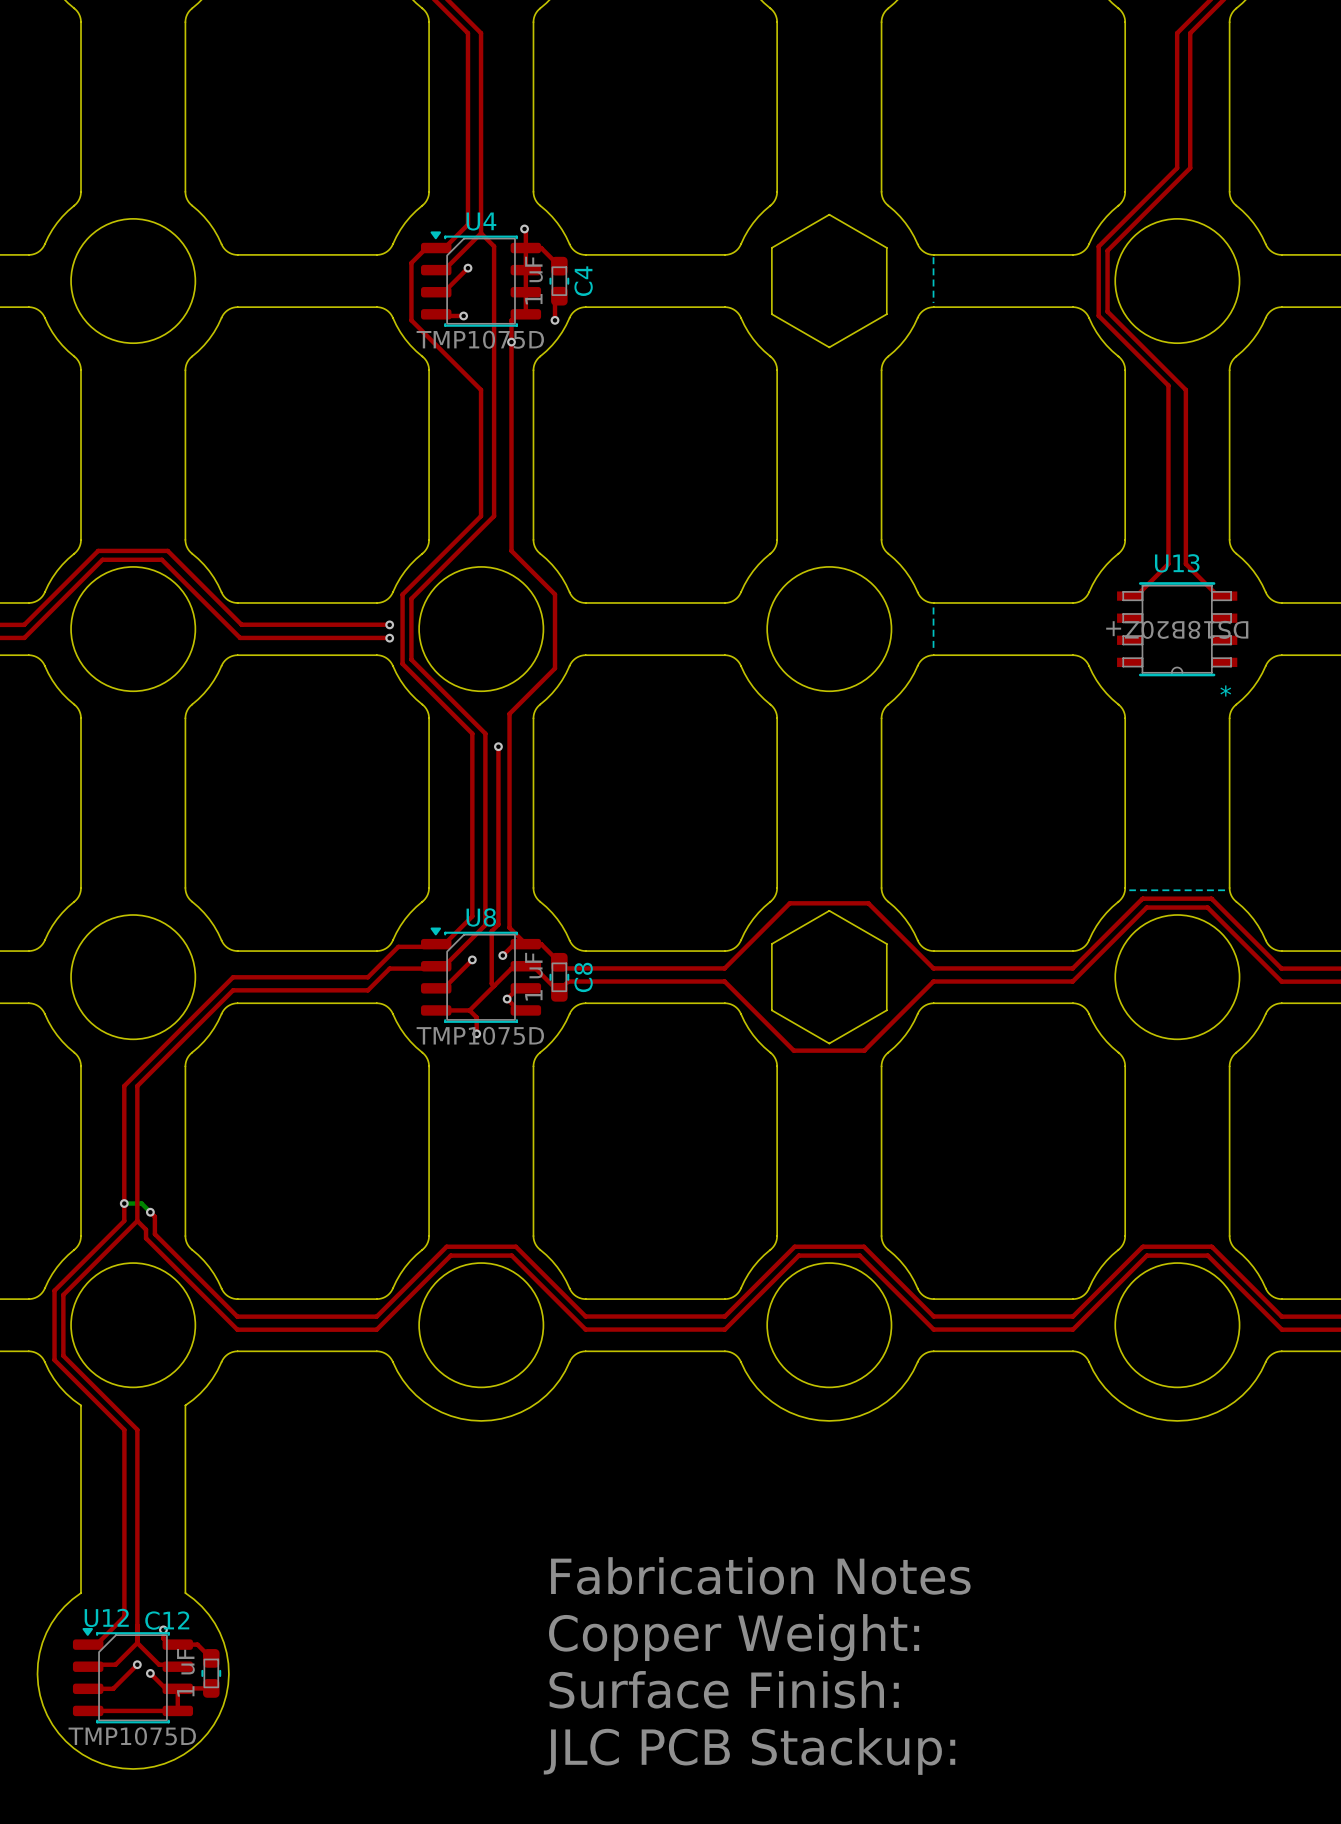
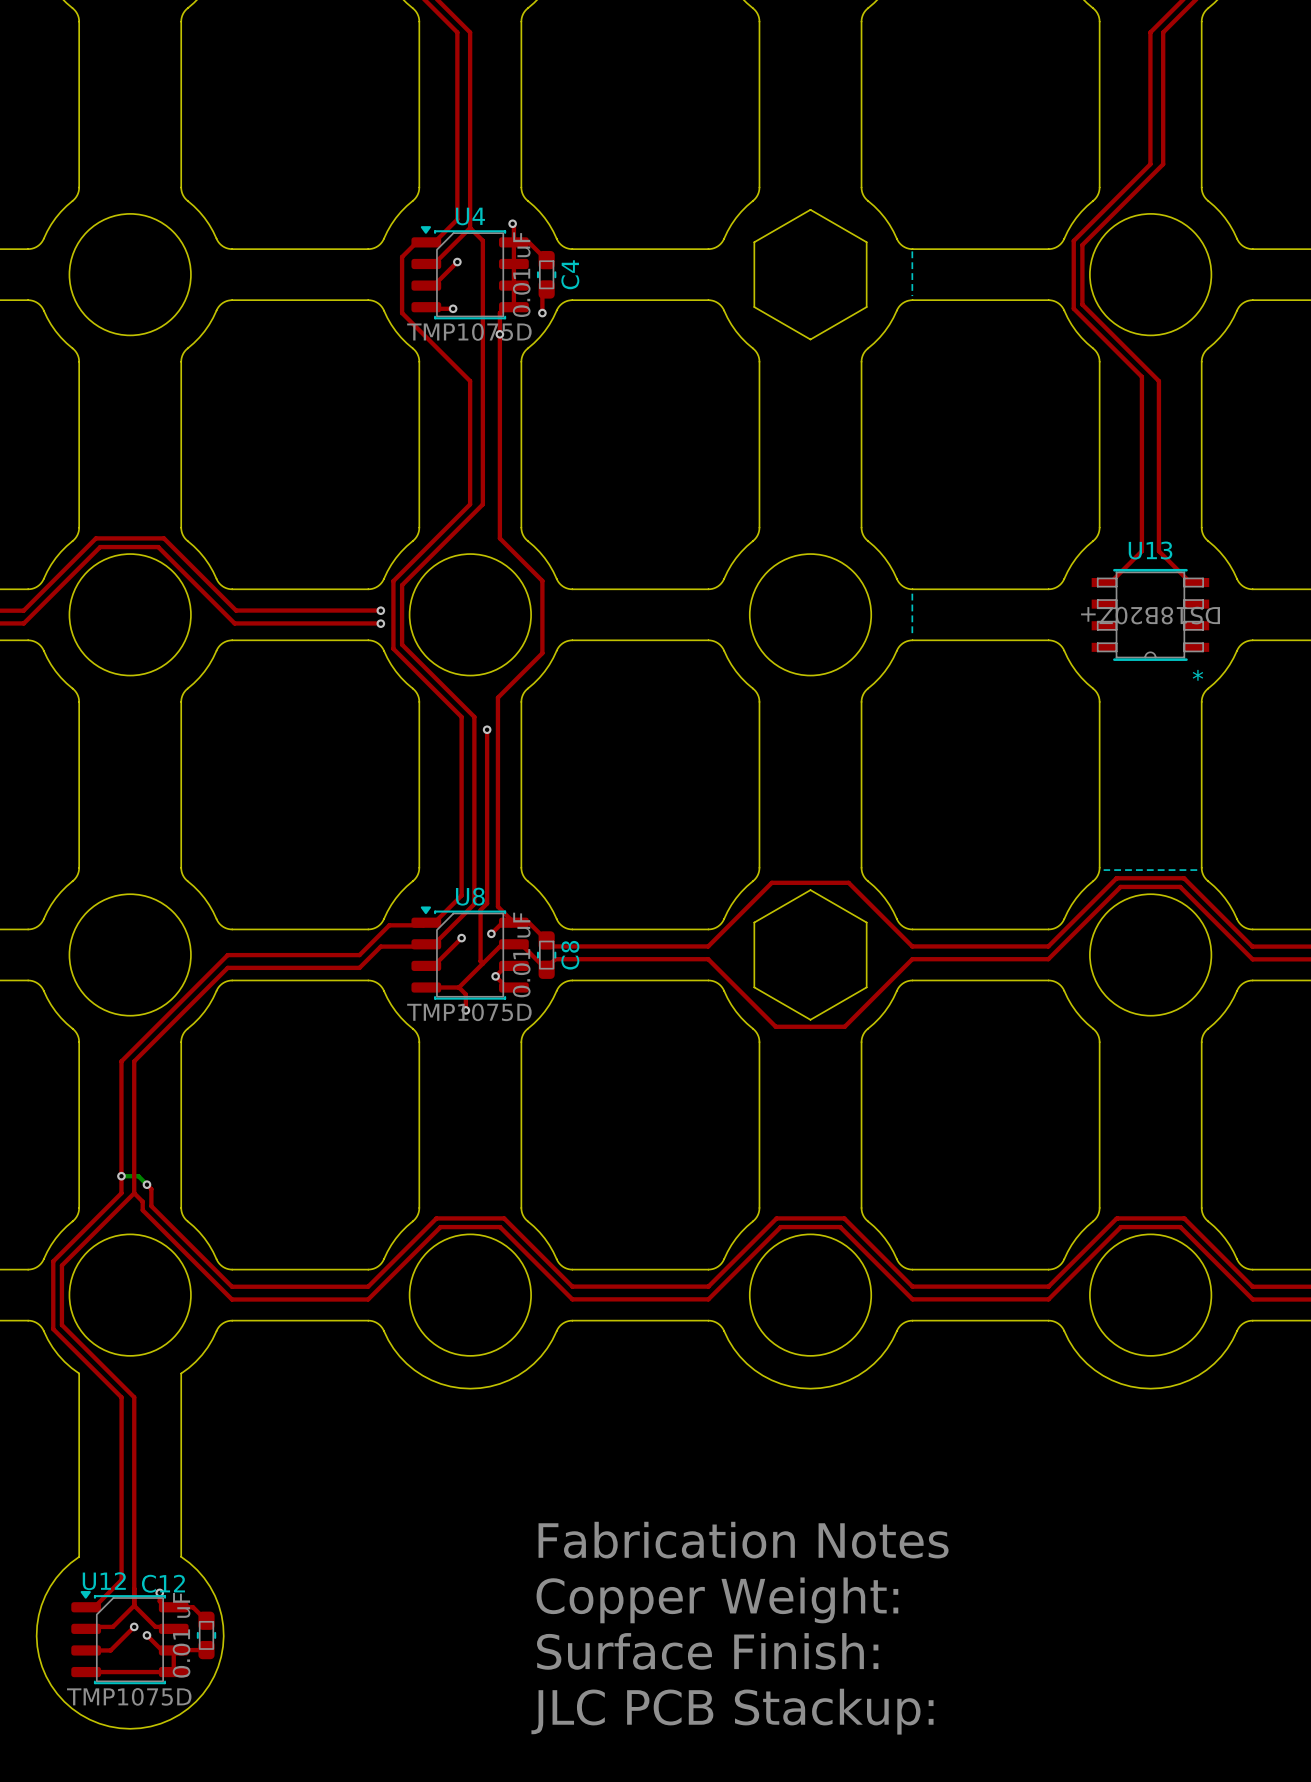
C4 value: 1 uF (533, 280) -> 0.01 uF (521, 274)
C8 value: 1 uF (533, 976) -> 0.01 uF (521, 955)
C12 value: 1 uF (185, 1672) -> 0.01 uF (181, 1635)

